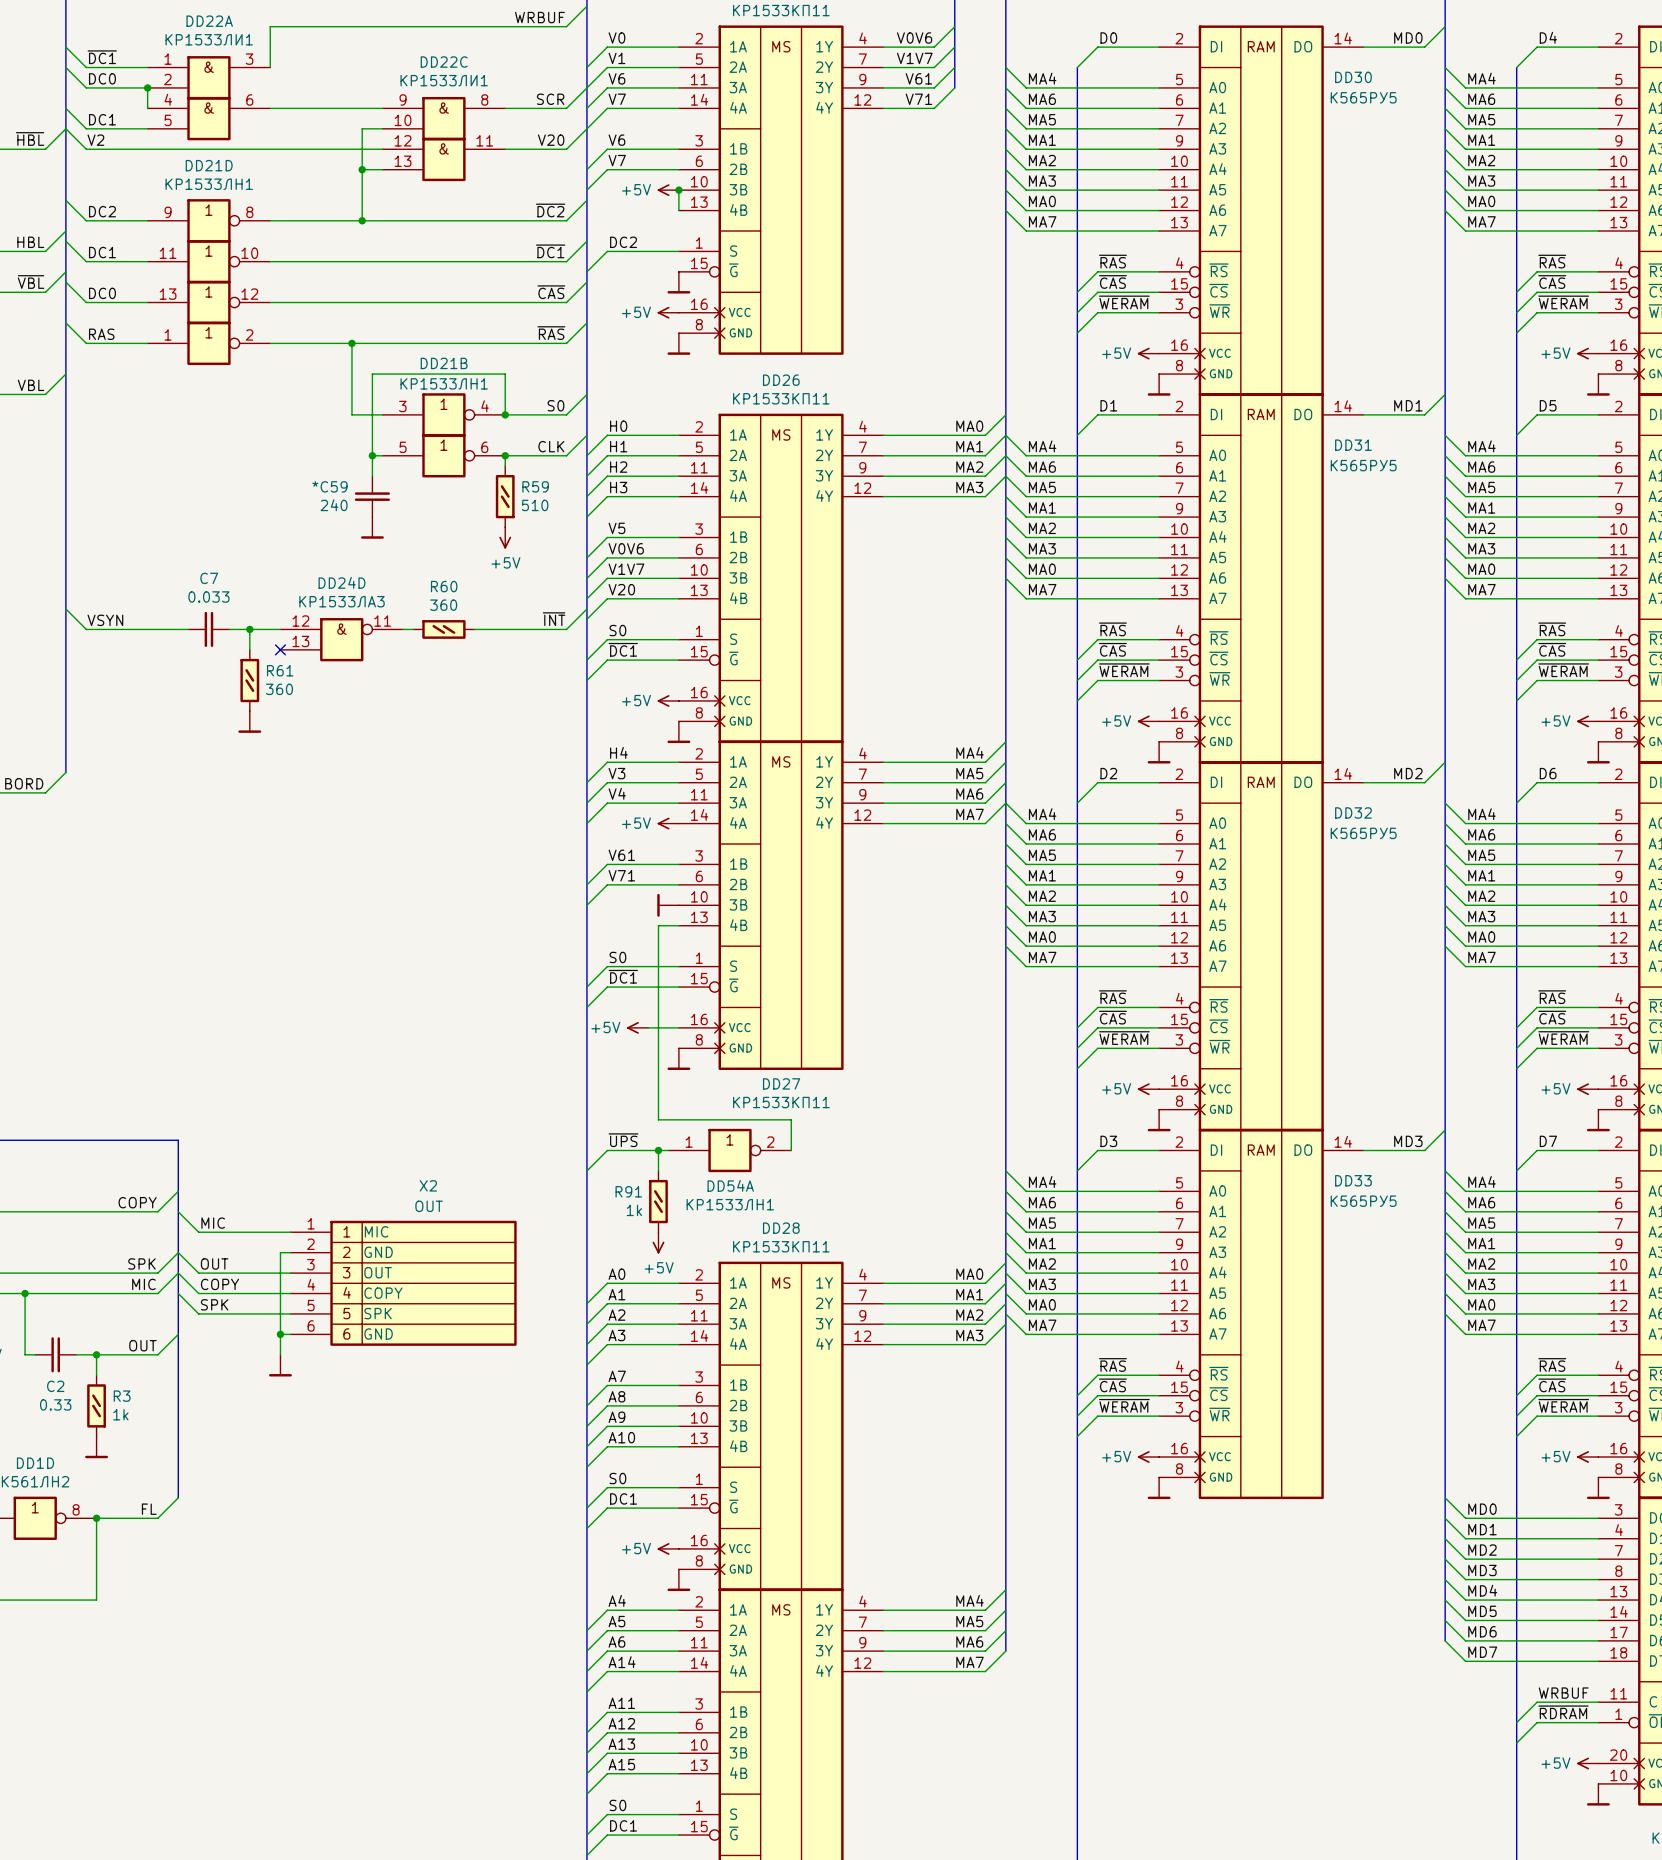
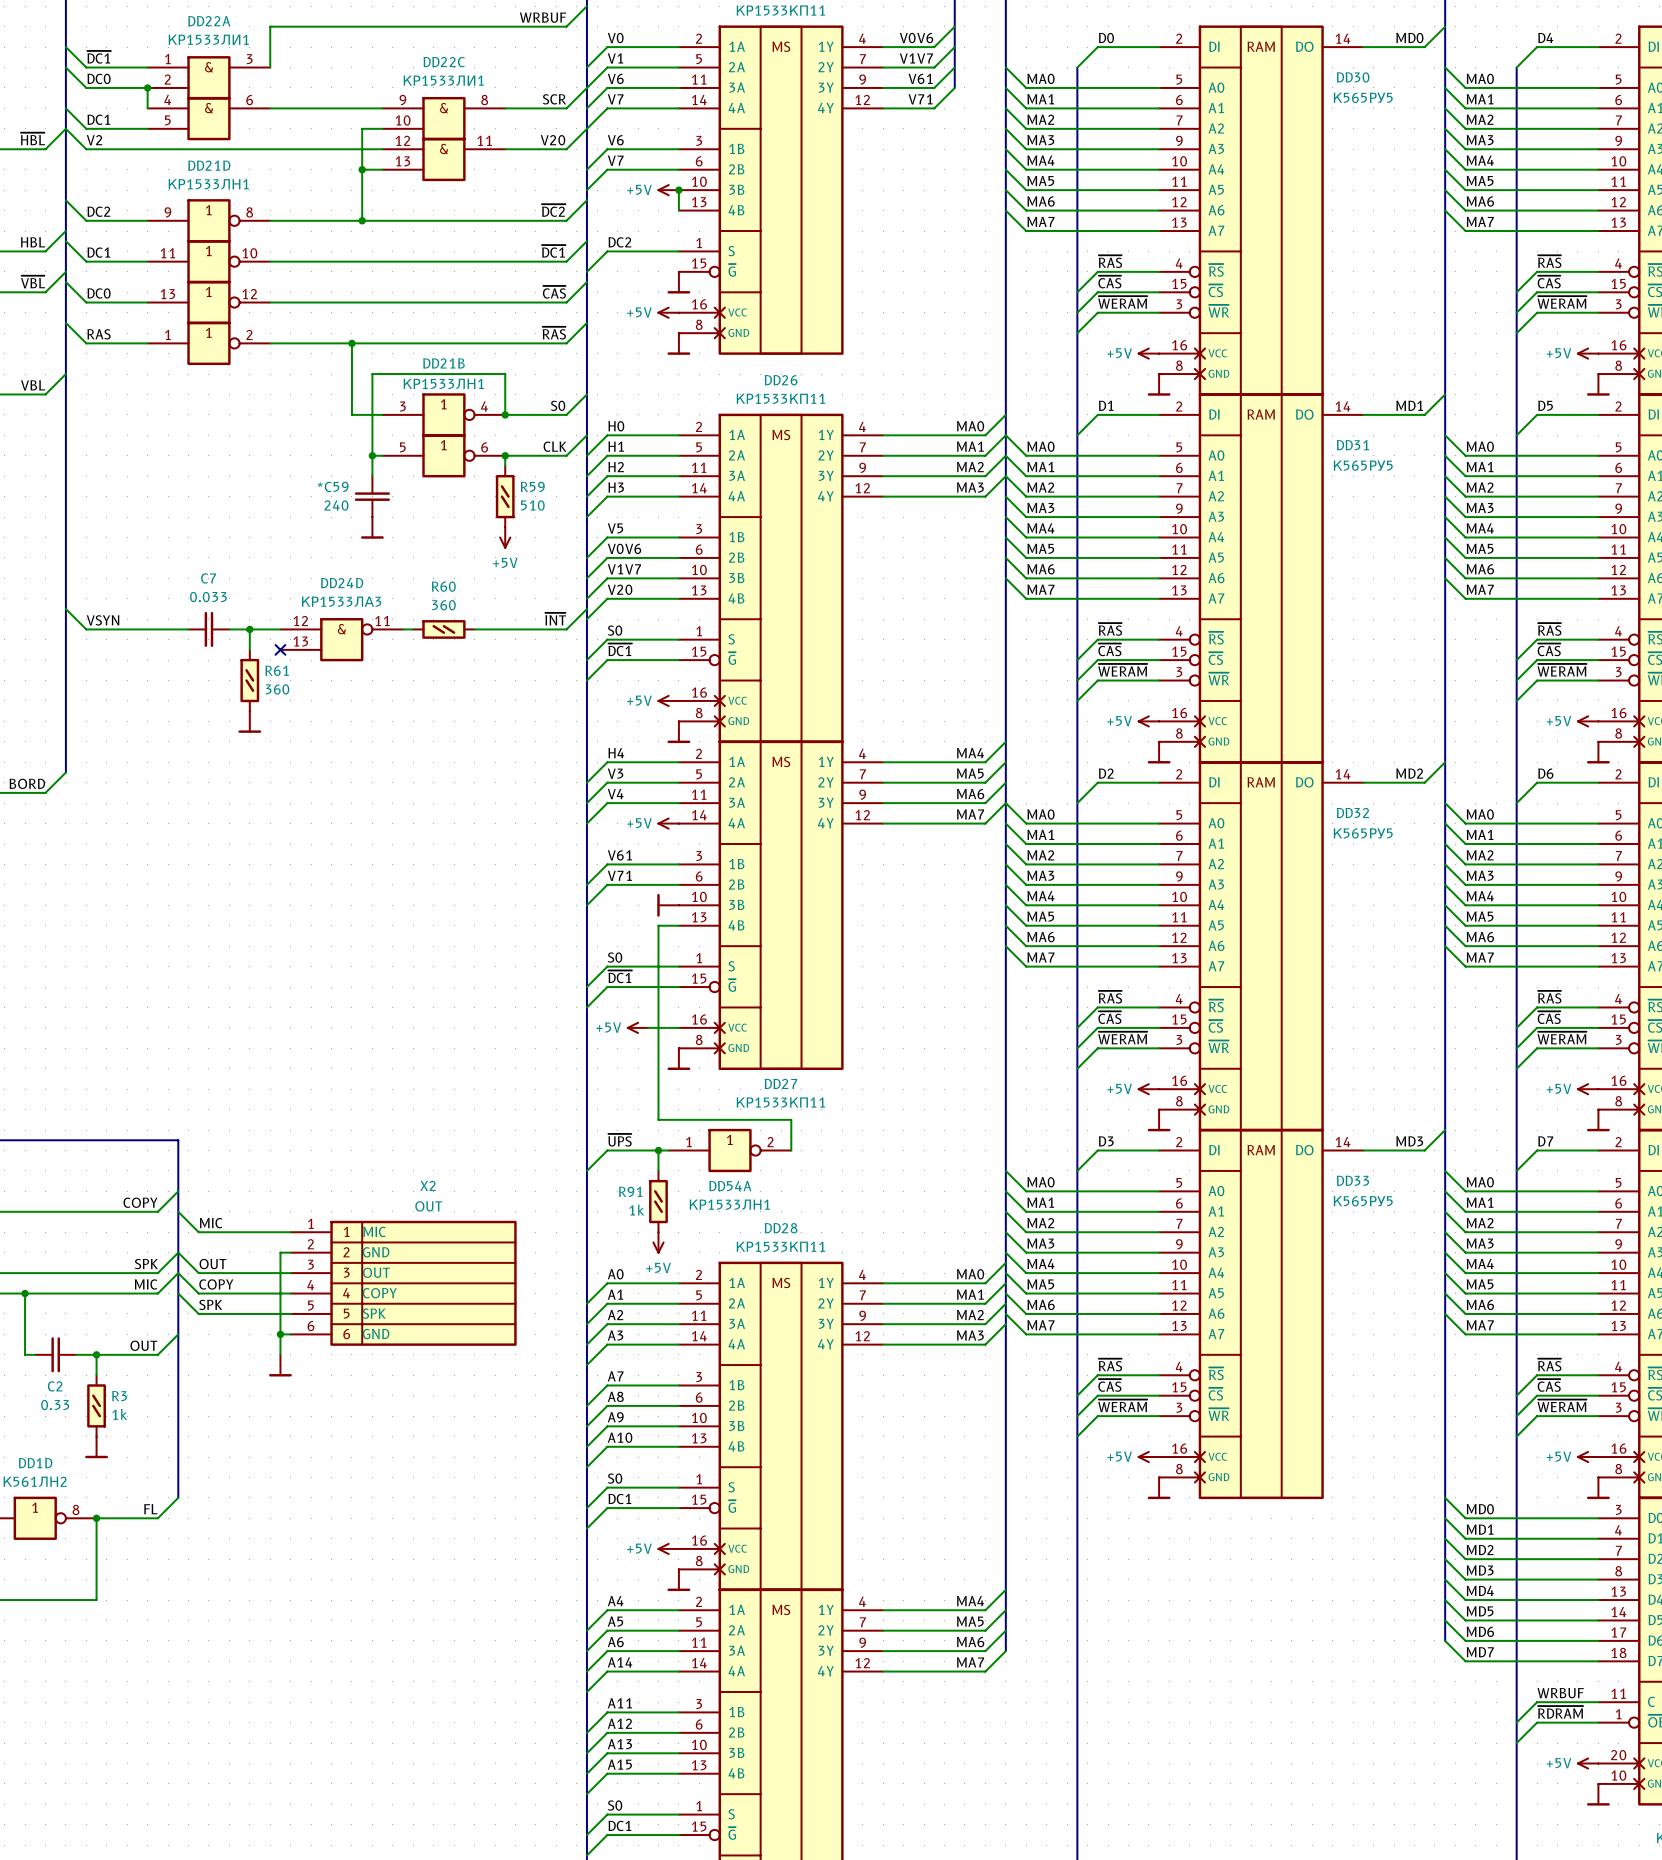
label: MA4 (1042, 78) -> MA0 (1041, 78)
label: MA4 (1481, 78) -> MA0 (1480, 78)
label: MA6 (1042, 99) -> MA1 (1040, 99)
label: MA6 (1481, 99) -> MA1 (1480, 99)
label: MA5 (1042, 119) -> MA2 (1040, 119)
label: MA5 (1481, 119) -> MA2 (1480, 119)
label: MA1 (1042, 140) -> MA3 (1040, 140)
label: MA1 (1481, 140) -> MA3 (1480, 140)
label: MA2 (1042, 160) -> MA4 (1040, 160)
label: MA2 (1481, 160) -> MA4 (1480, 160)
label: MA3 (1042, 181) -> MA5 (1040, 181)
label: MA3 (1481, 181) -> MA5 (1480, 181)
label: MA0 (1042, 201) -> MA6 (1041, 201)
label: MA0 (1481, 201) -> MA6 (1480, 201)
label: MA4 (1042, 446) -> MA0 (1041, 446)
label: MA4 (1481, 446) -> MA0 (1480, 446)
label: MA6 (1042, 467) -> MA1 (1040, 467)
label: MA6 (1481, 467) -> MA1 (1480, 467)
label: MA5 (1042, 487) -> MA2 (1040, 487)
label: MA5 (1481, 487) -> MA2 (1480, 487)
label: MA1 (1042, 507) -> MA3 (1040, 507)
label: MA1 (1481, 507) -> MA3 (1480, 507)
label: MA2 (1042, 528) -> MA4 (1040, 528)
label: MA2 (1481, 528) -> MA4 (1480, 528)
label: MA3 (1042, 548) -> MA5 (1040, 548)
label: MA3 (1481, 548) -> MA5 (1480, 548)
label: MA0 (1042, 569) -> MA6 (1041, 569)
label: MA0 (1481, 569) -> MA6 (1480, 569)
label: MA4 (1042, 814) -> MA0 (1041, 814)
label: MA4 (1481, 814) -> MA0 (1480, 814)
label: MA6 (1042, 834) -> MA1 (1040, 834)
label: MA6 (1481, 834) -> MA1 (1480, 834)
label: MA5 (1042, 855) -> MA2 (1040, 855)
label: MA5 (1481, 855) -> MA2 (1480, 855)
label: MA1 (1042, 875) -> MA3 (1040, 875)
label: MA1 (1481, 875) -> MA3 (1480, 875)
label: MA2 (1042, 896) -> MA4 (1040, 896)
label: MA2 (1481, 896) -> MA4 (1480, 896)
label: MA3 (1042, 916) -> MA5 (1040, 916)
label: MA3 (1481, 916) -> MA5 (1480, 916)
label: MA0 (1042, 937) -> MA6 (1041, 937)
label: MA0 (1481, 937) -> MA6 (1480, 937)
label: MA4 (1042, 1182) -> MA0 (1041, 1182)
label: MA4 (1481, 1182) -> MA0 (1480, 1182)
label: MA6 (1042, 1202) -> MA1 (1040, 1202)
label: MA6 (1481, 1202) -> MA1 (1480, 1202)
label: MA5 (1042, 1223) -> MA2 (1040, 1223)
label: MA5 (1481, 1223) -> MA2 (1480, 1223)
label: MA1 (1042, 1243) -> MA3 (1040, 1243)
label: MA1 (1481, 1243) -> MA3 (1480, 1243)
label: MA2 (1042, 1263) -> MA4 (1040, 1263)
label: MA2 (1481, 1263) -> MA4 (1480, 1263)
label: MA3 (1042, 1284) -> MA5 (1040, 1284)
label: MA3 (1481, 1284) -> MA5 (1480, 1284)
label: MA0 (1042, 1304) -> MA6 (1041, 1304)
label: MA0 (1481, 1304) -> MA6 (1480, 1304)

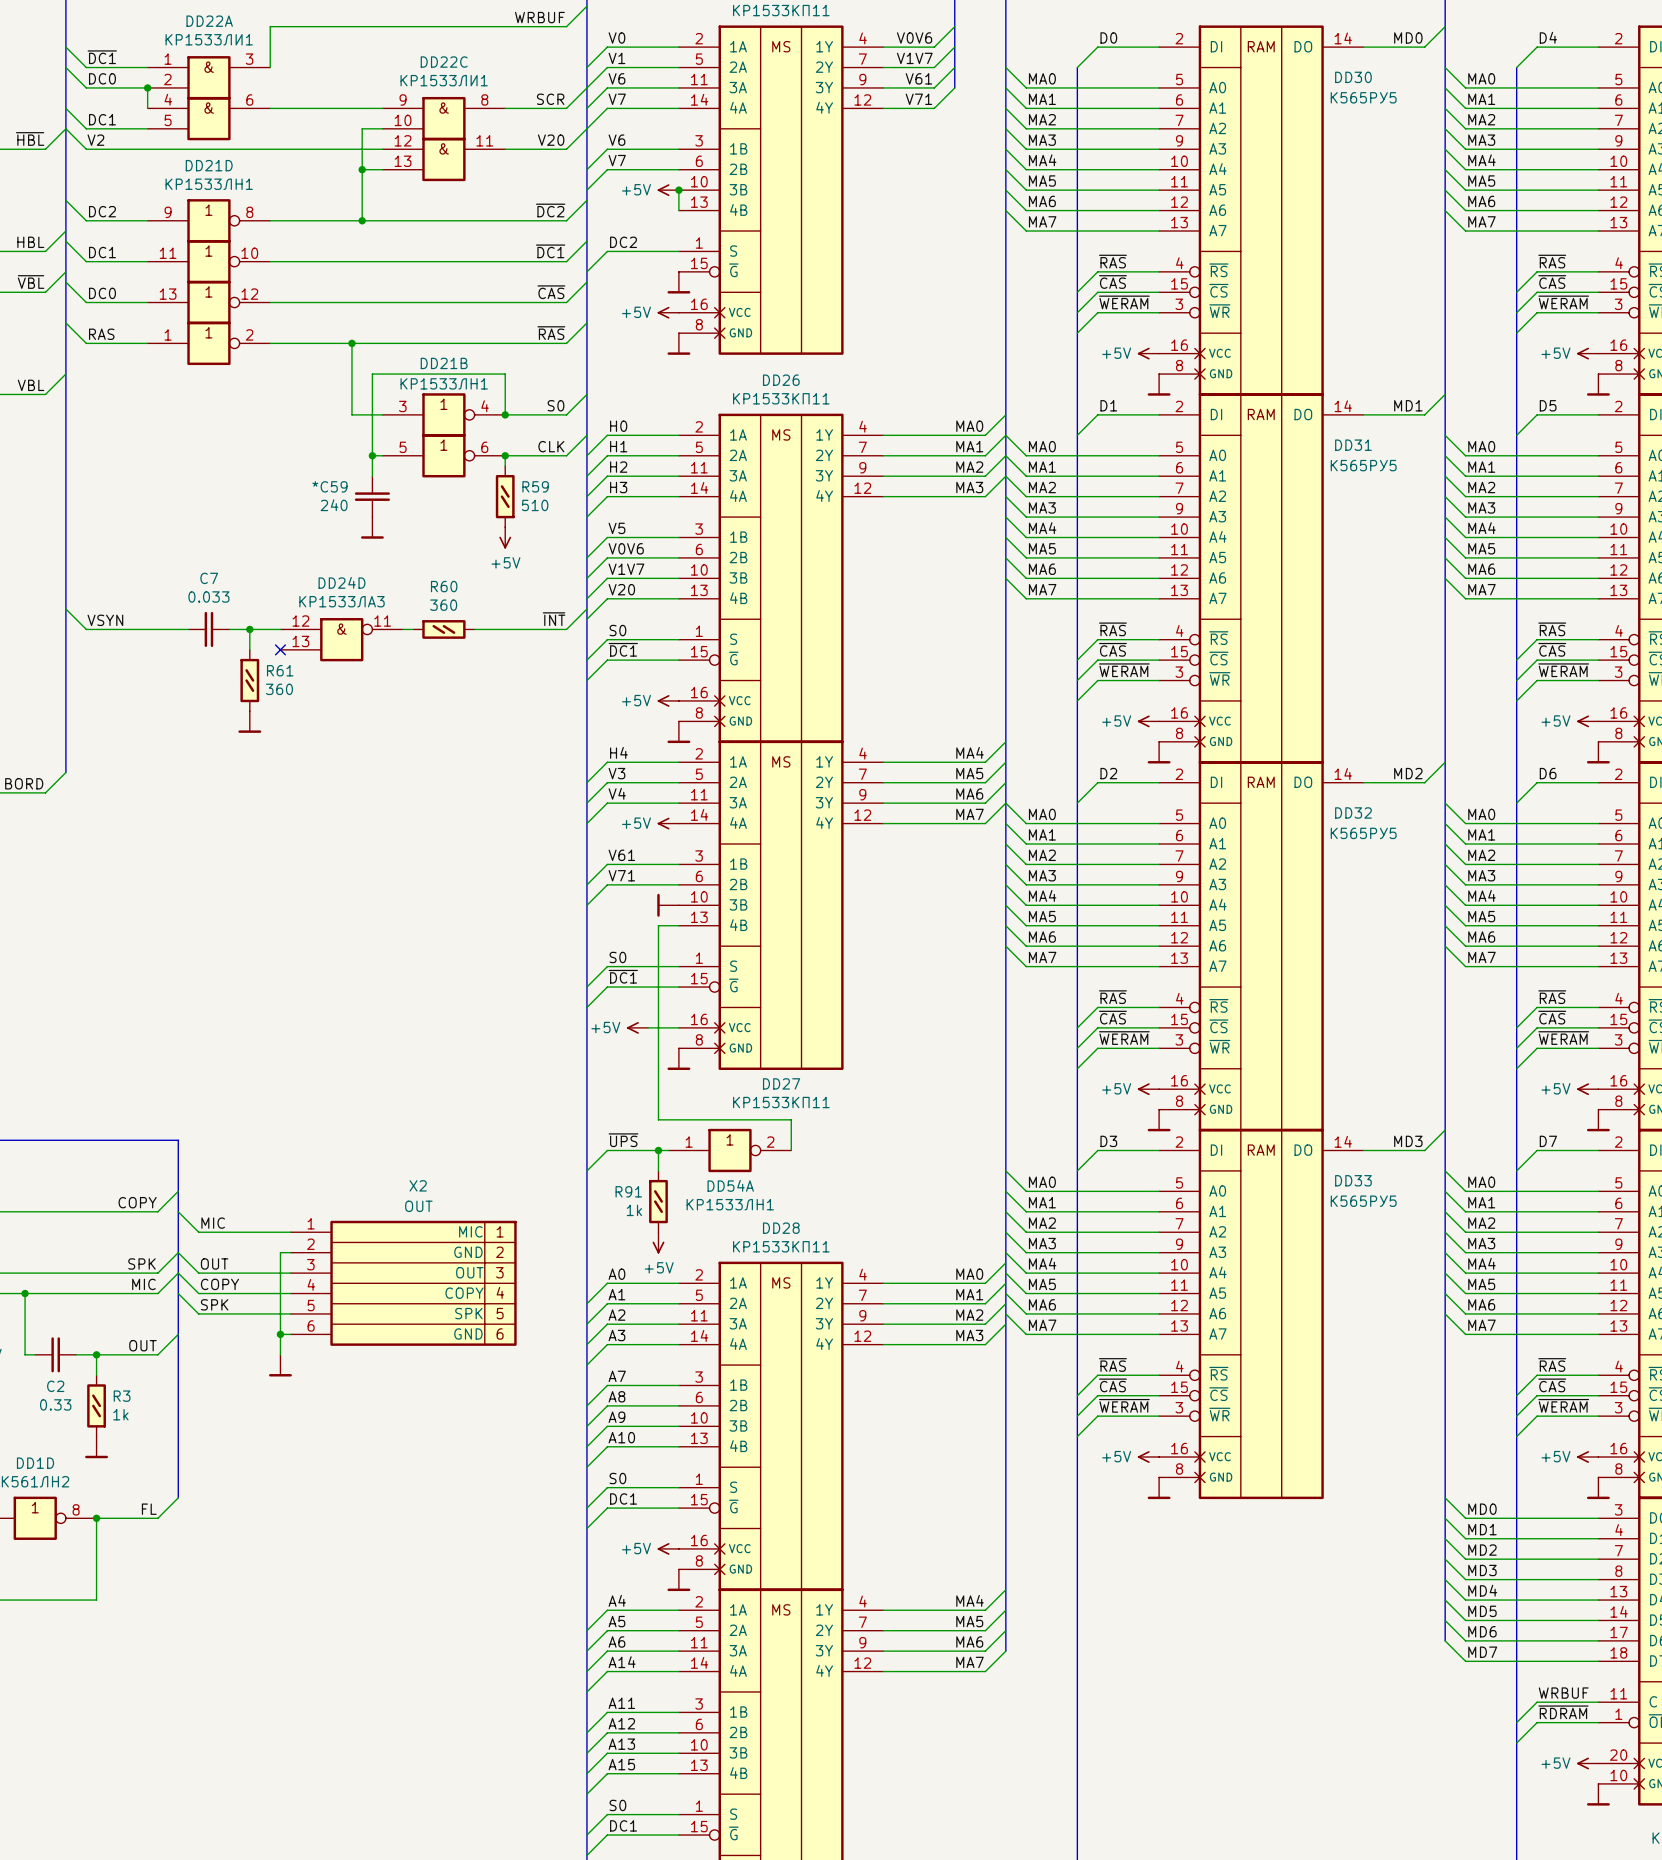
X2 symbol: [290, 1220, 517, 1346] -> [290, 1220, 517, 1346]
X2 text position: MIC (374, 1231) -> MIC (470, 1231)
X2 text position: GND (376, 1252) -> GND (468, 1252)
X2 text position: OUT (376, 1272) -> OUT (469, 1272)
X2 text position: COPY (379, 1293) -> COPY (464, 1293)
X2 text position: SPK (374, 1313) -> SPK (468, 1313)
X2 text position: GND (376, 1334) -> GND (468, 1334)

